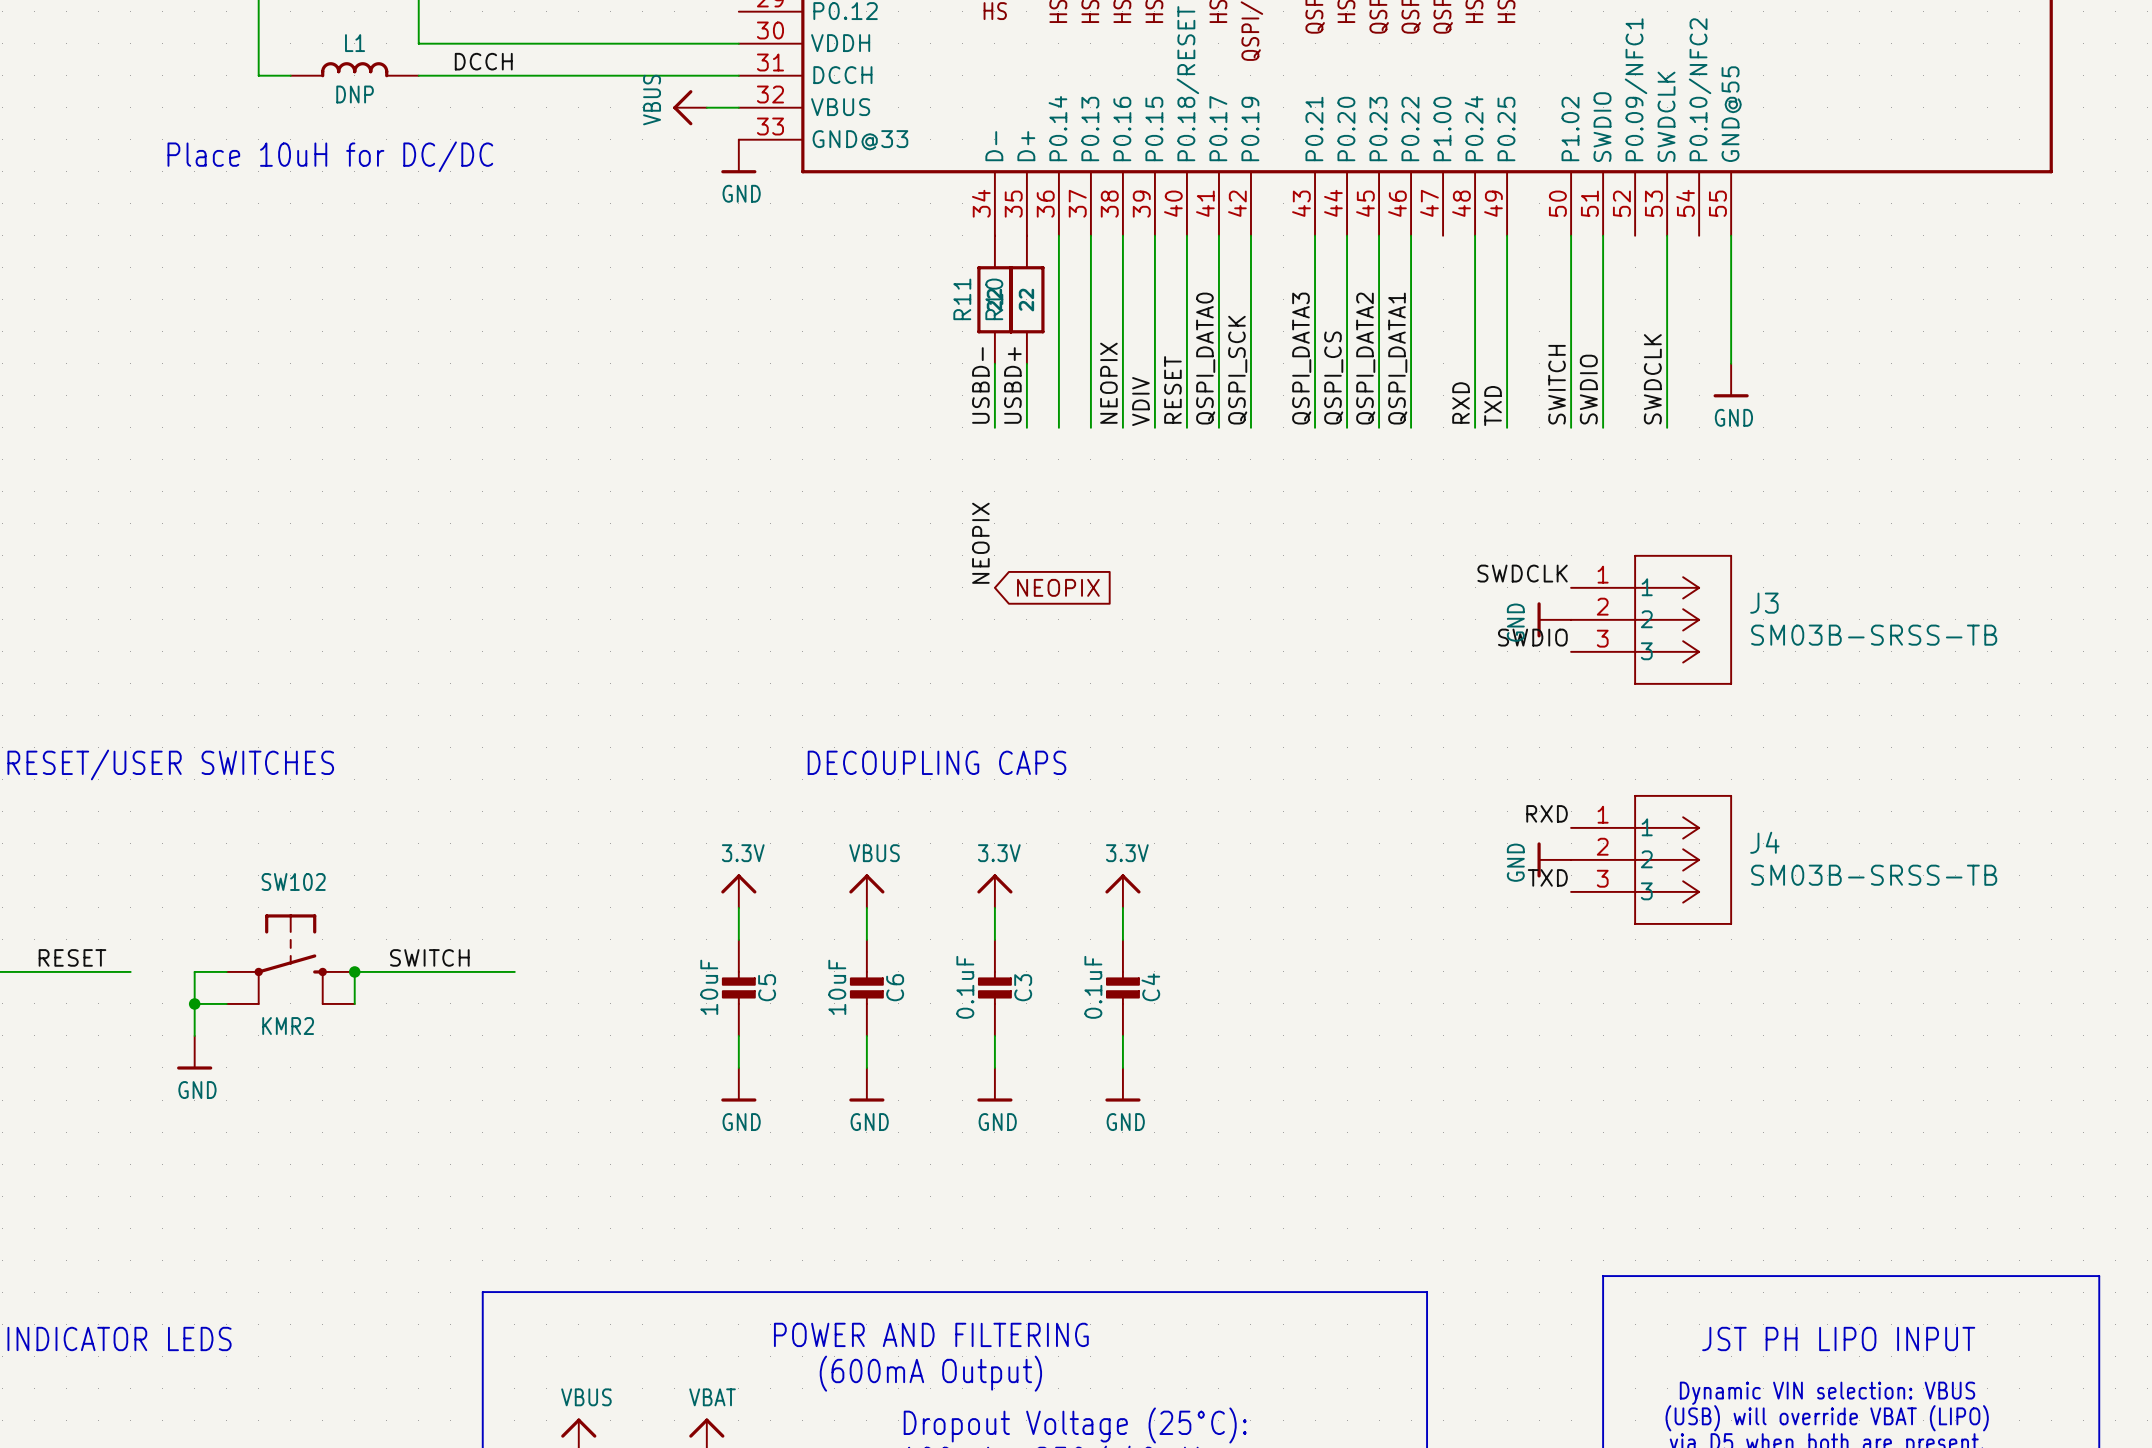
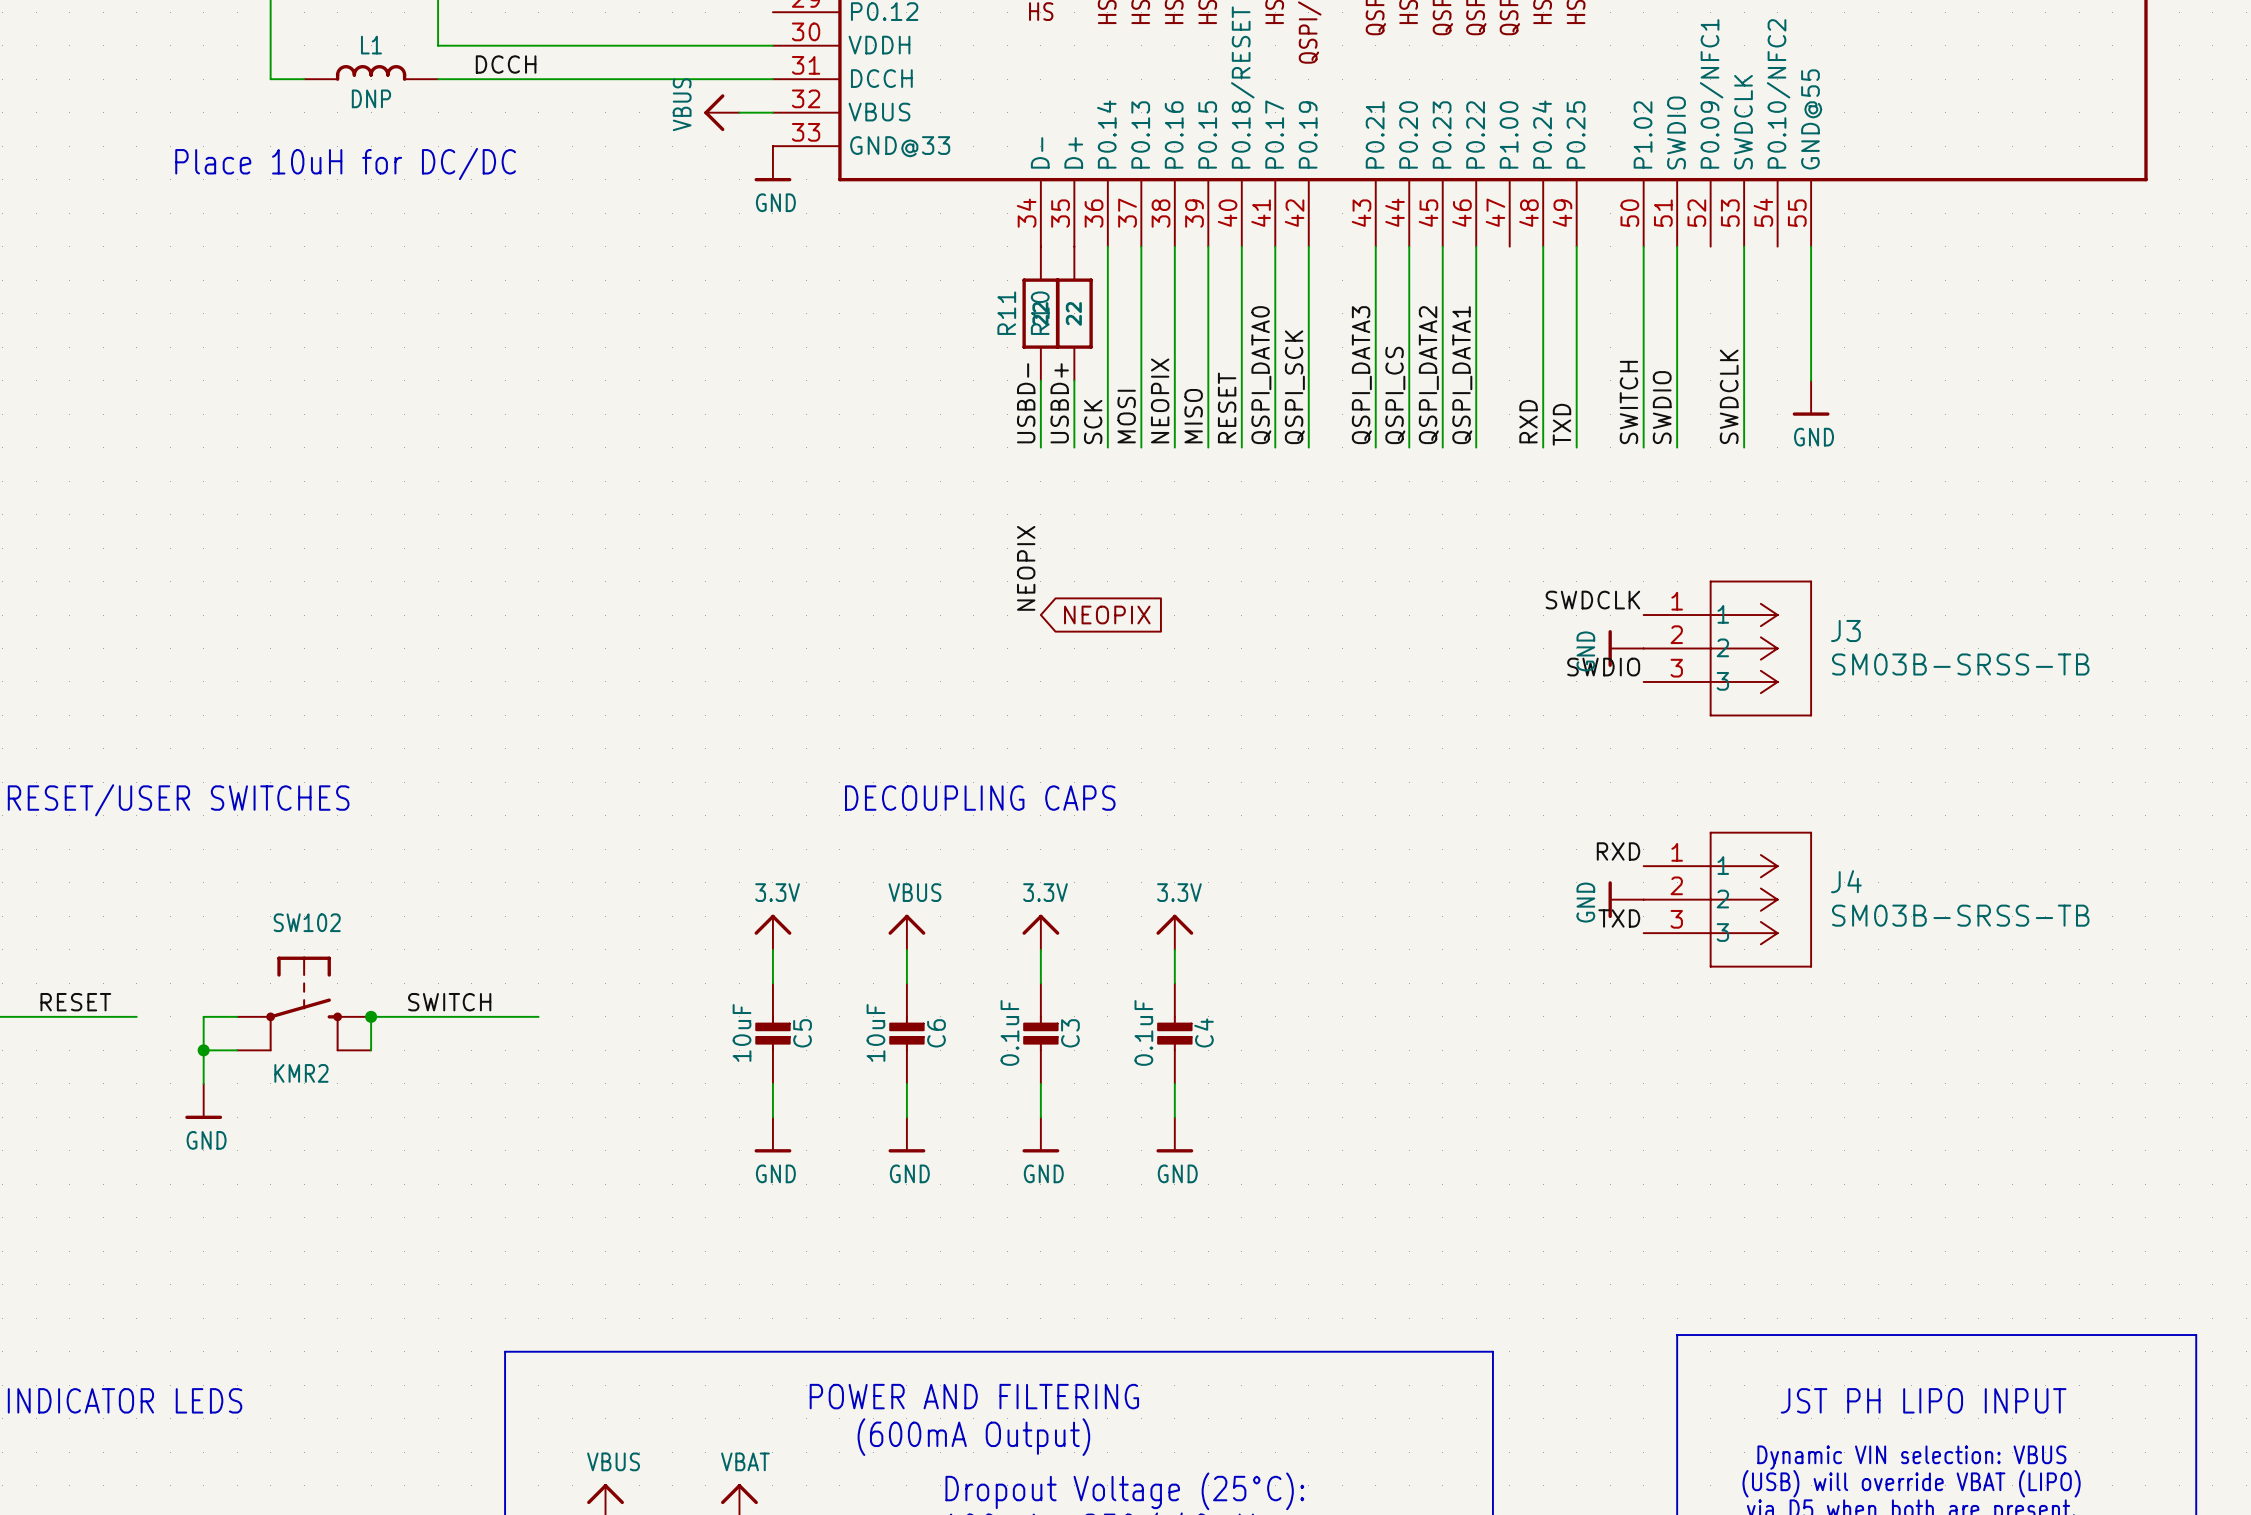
label: none -> MOSI (1126, 416)
label: VDIV (1140, 401) -> MISO (1193, 416)
label: none -> SCK (1093, 422)

